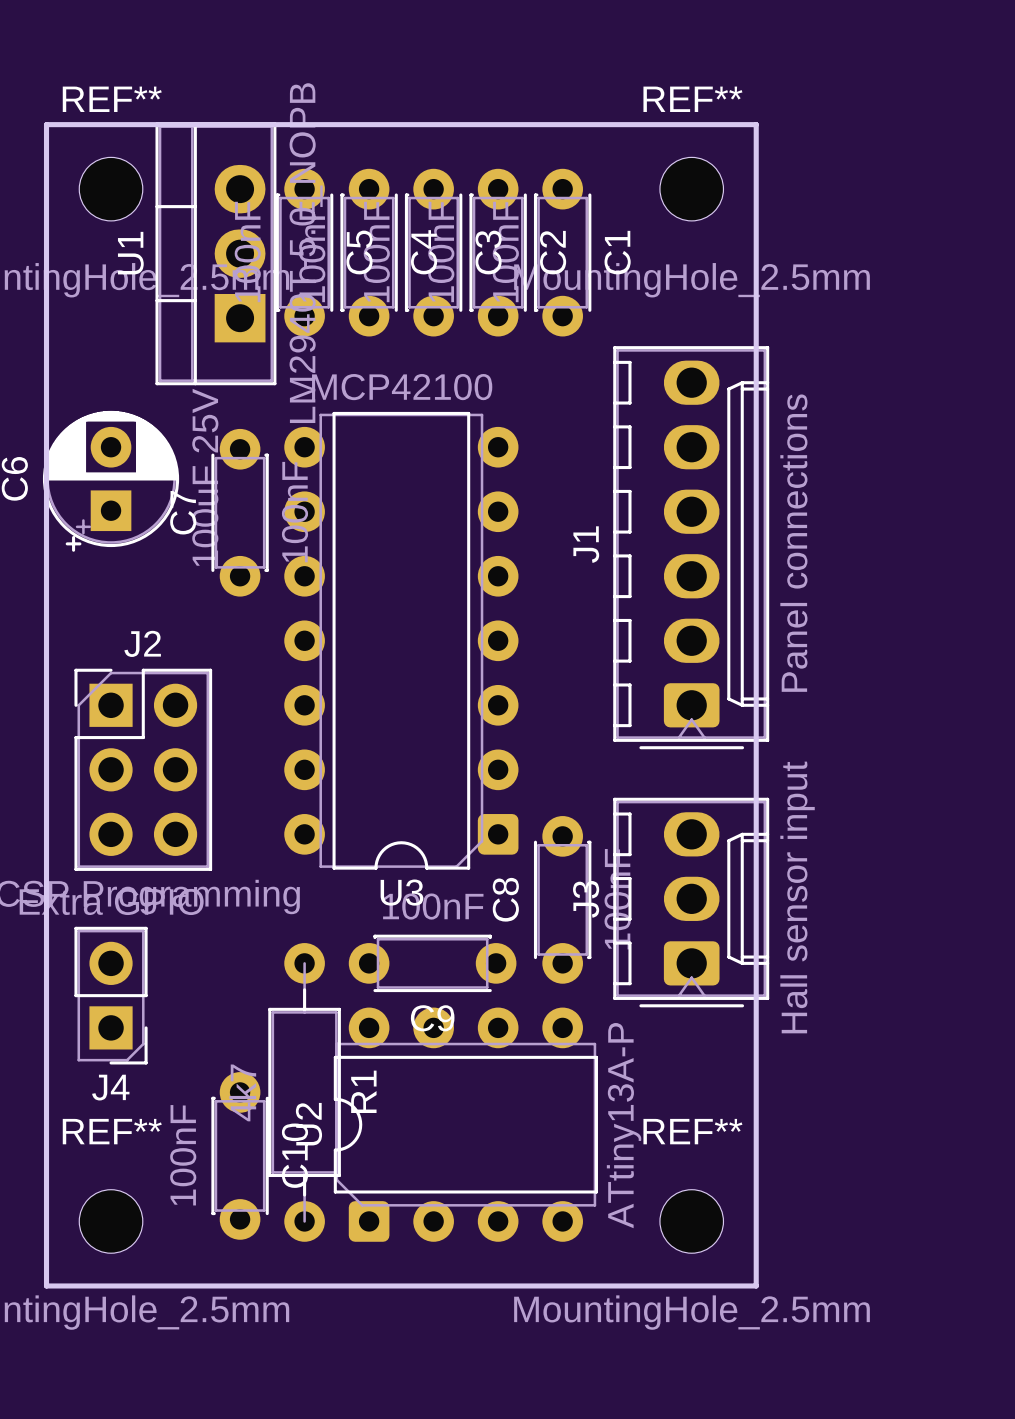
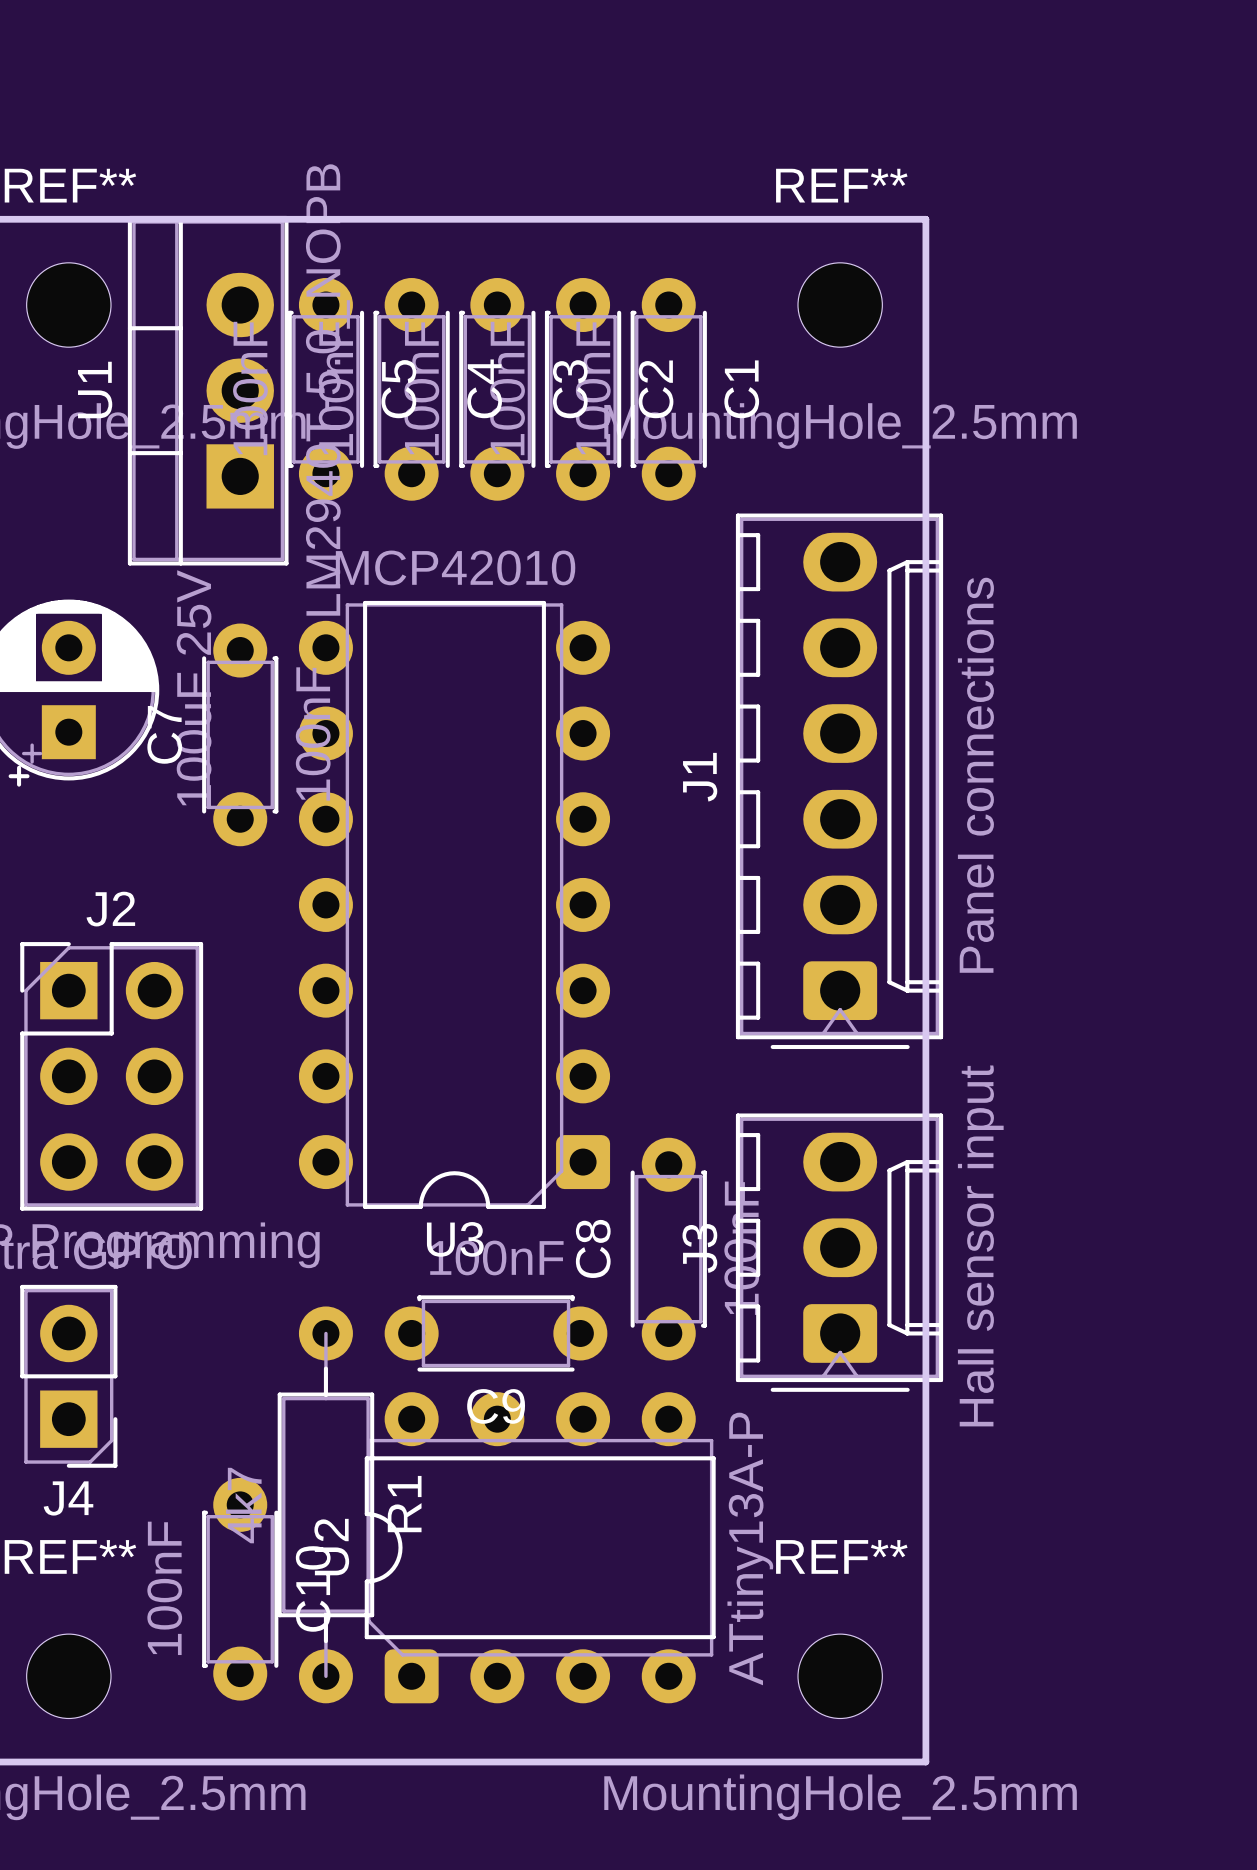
U3 value: MCP42100 (402, 387) -> MCP42010 (455, 567)

